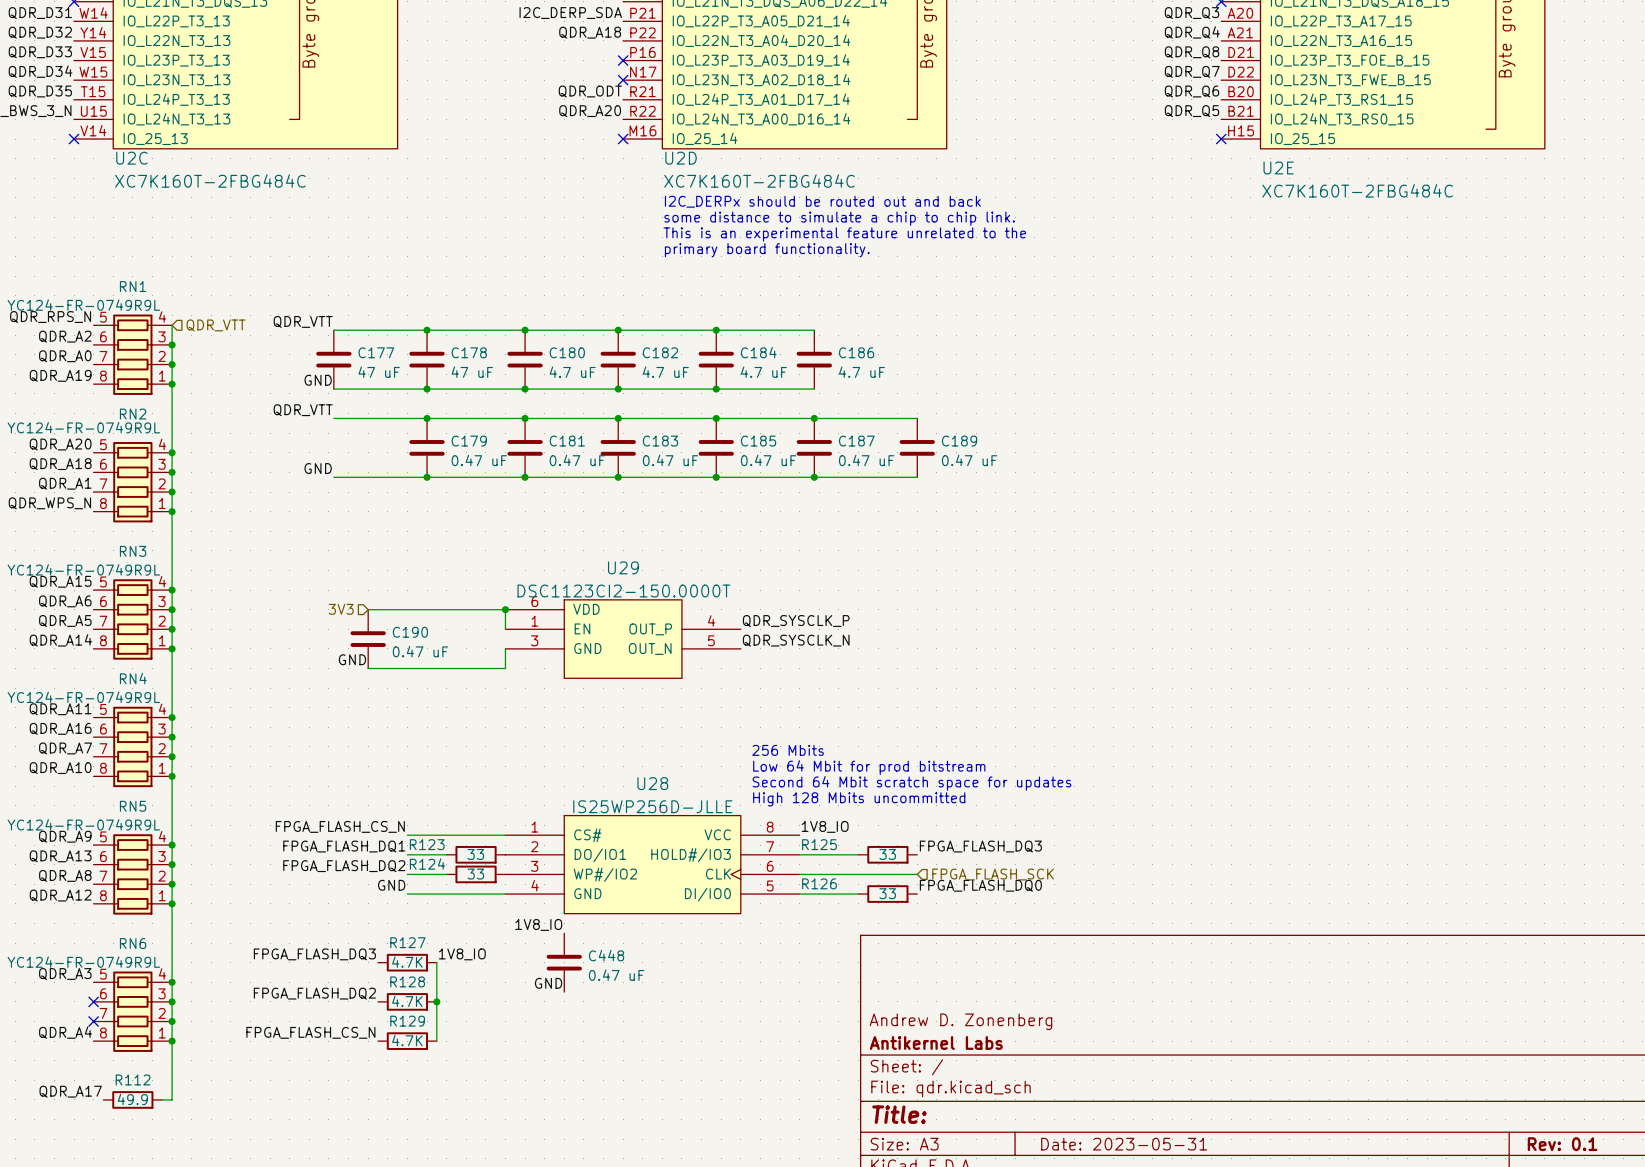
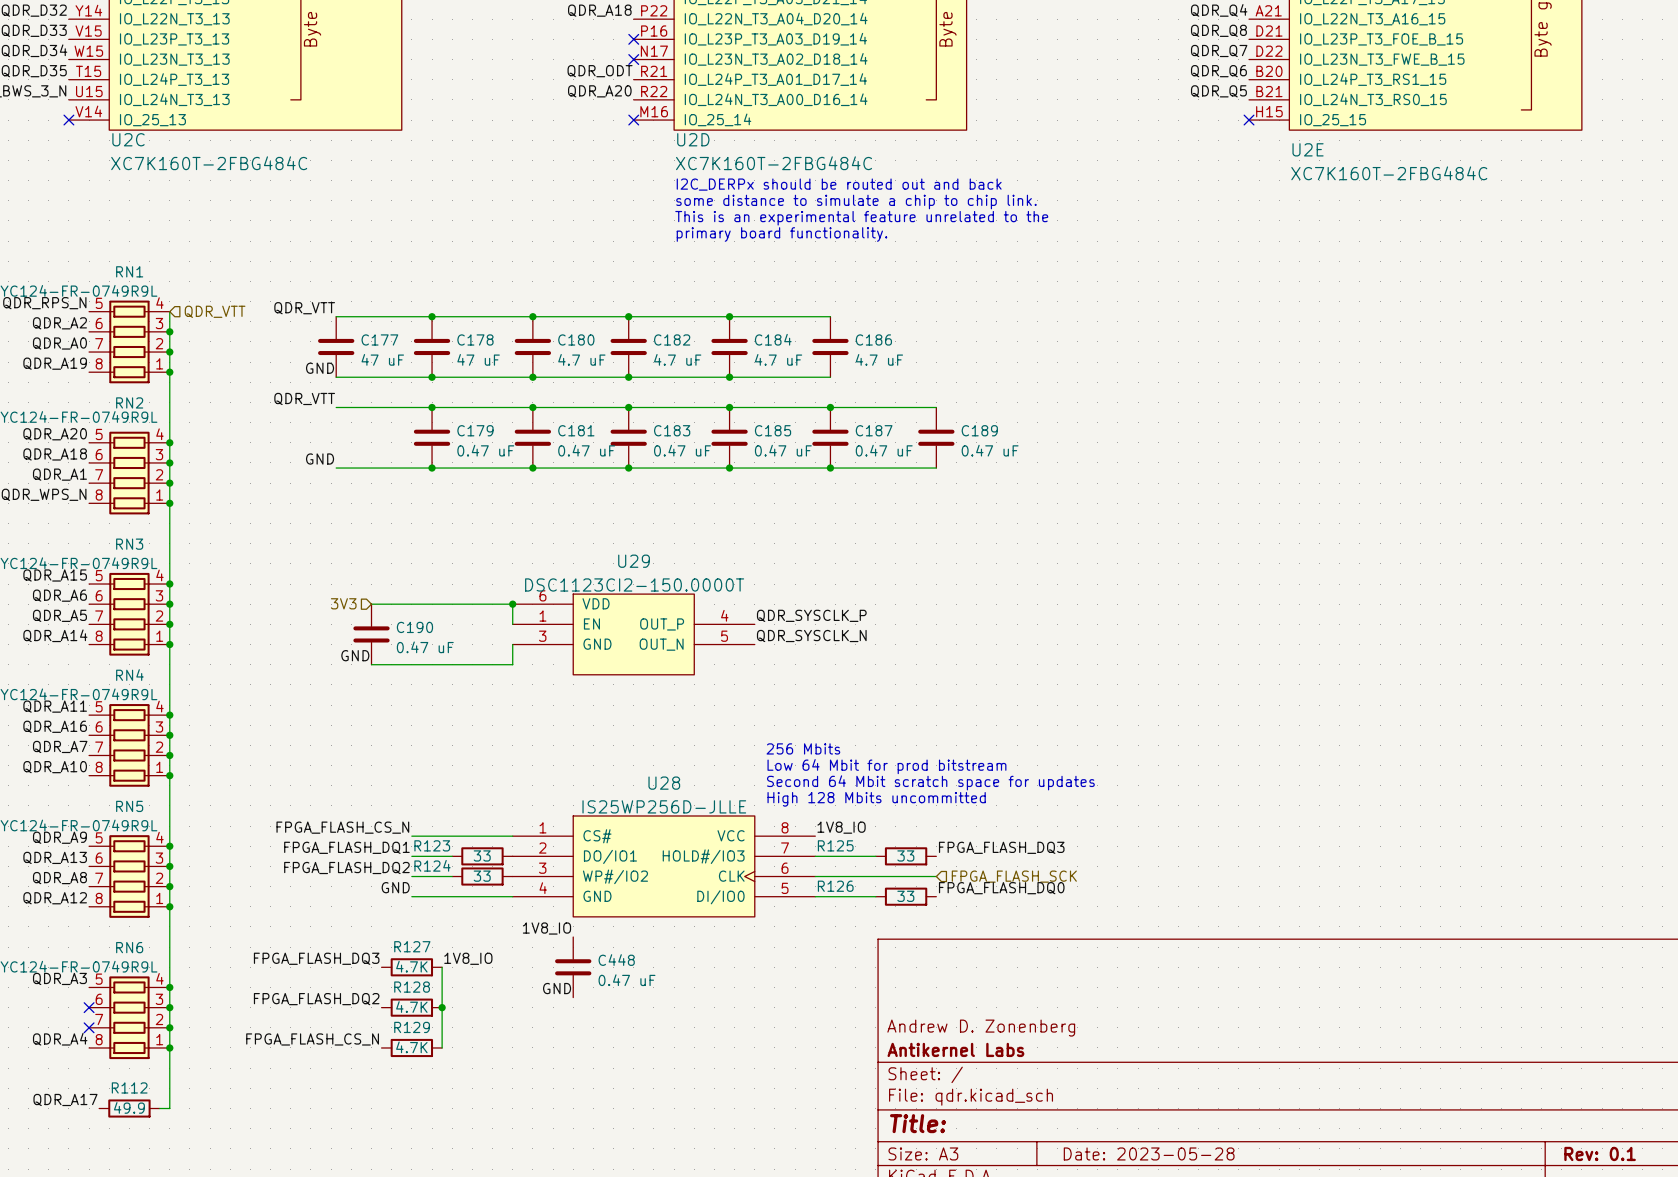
title block: Date: 2023-05-31 (1124, 1144) -> Date: 2023-05-28 (1149, 1153)

